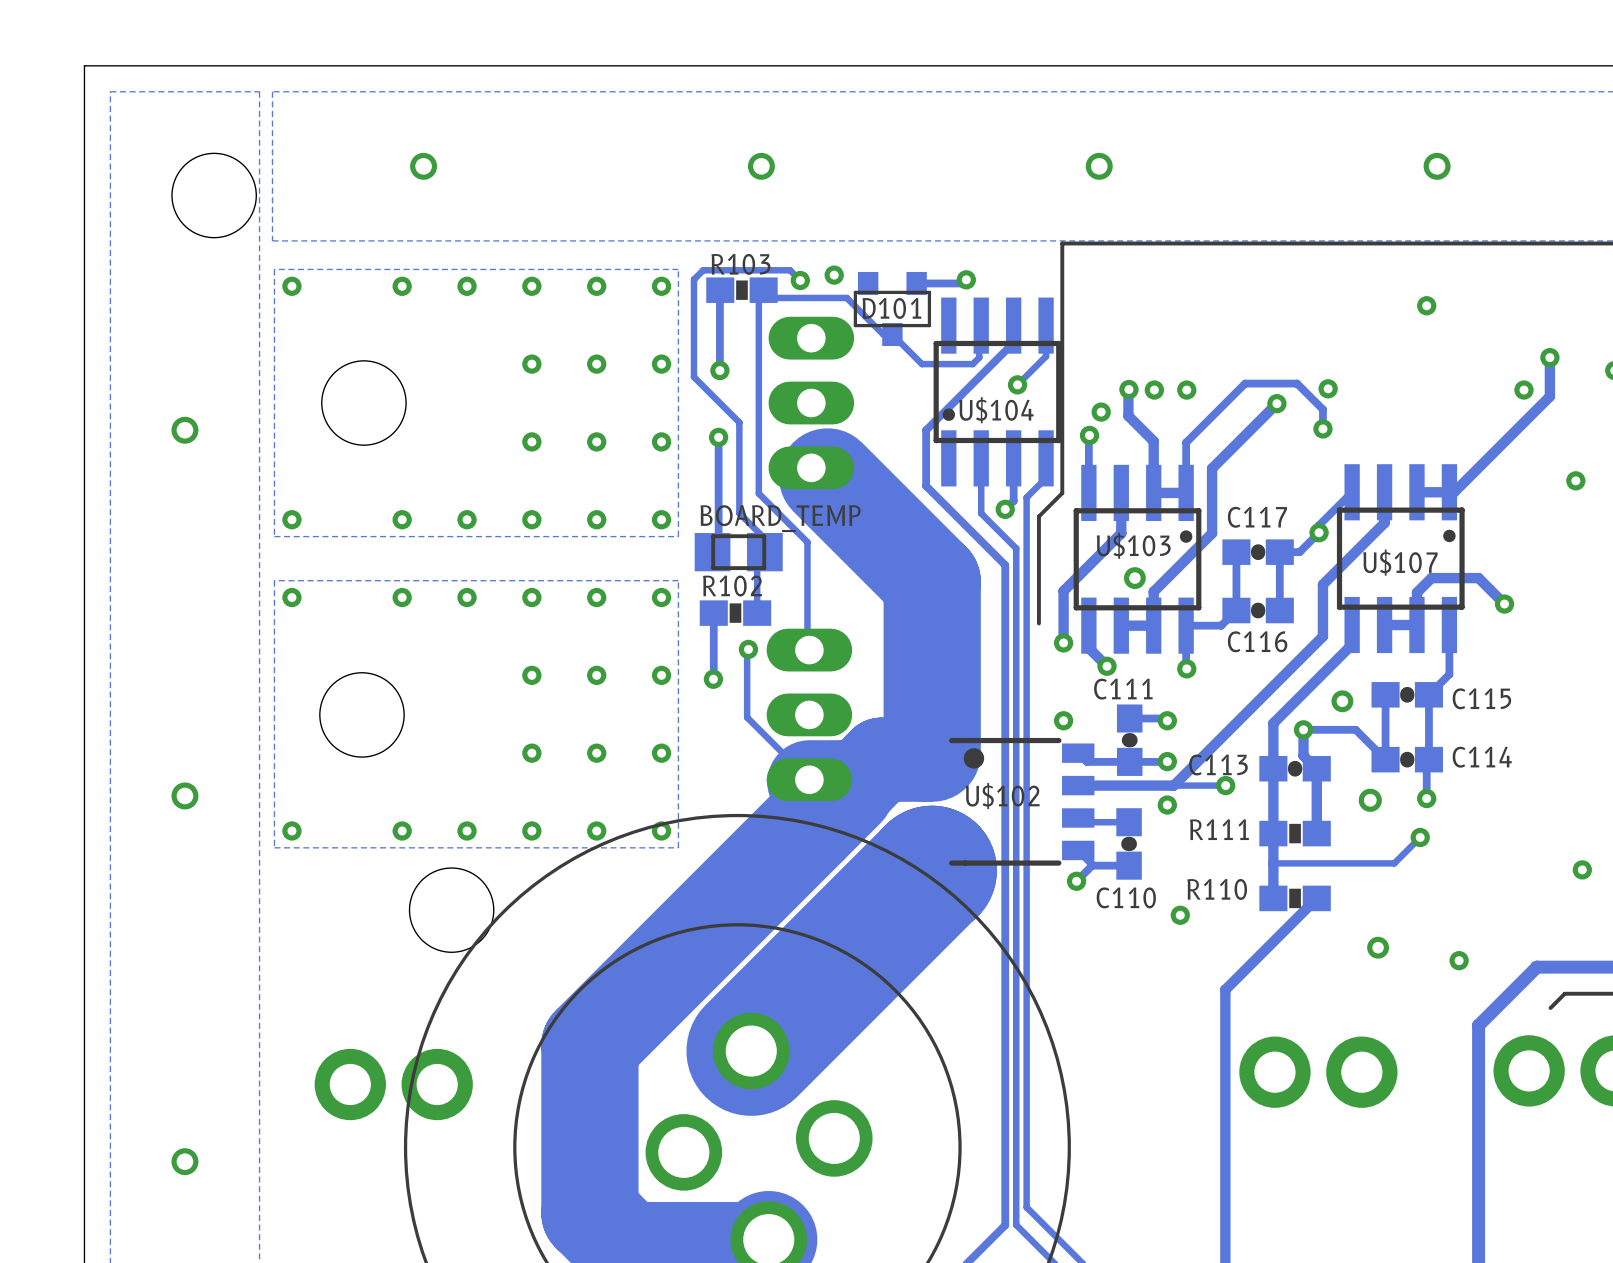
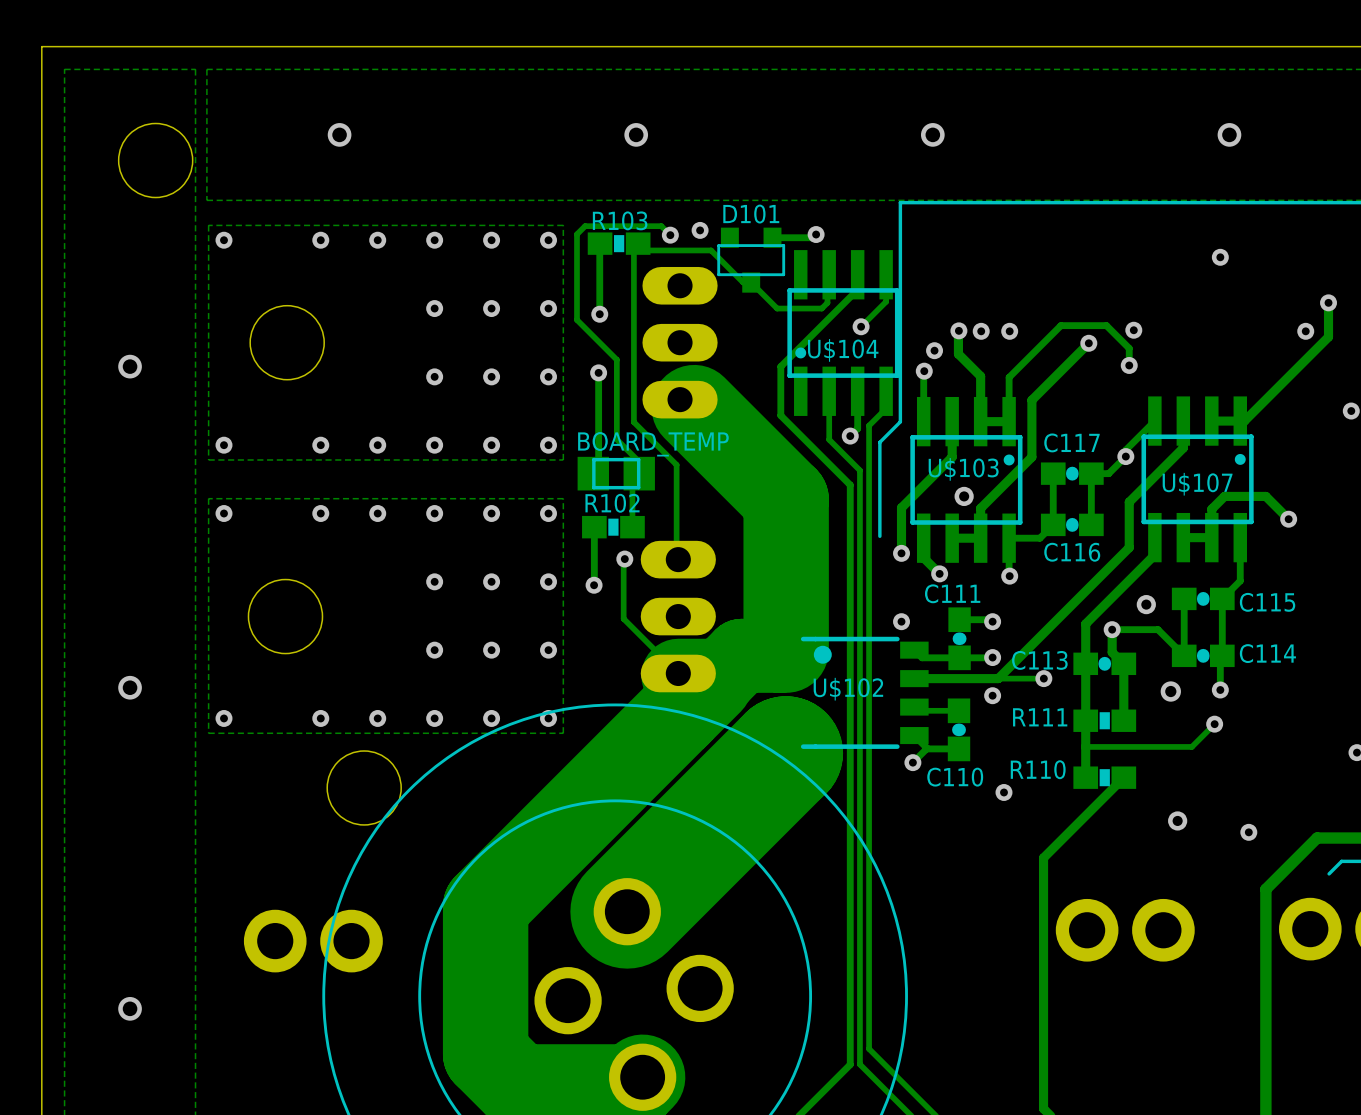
D101 name position: D101 (891, 308) -> D101 (751, 214)

